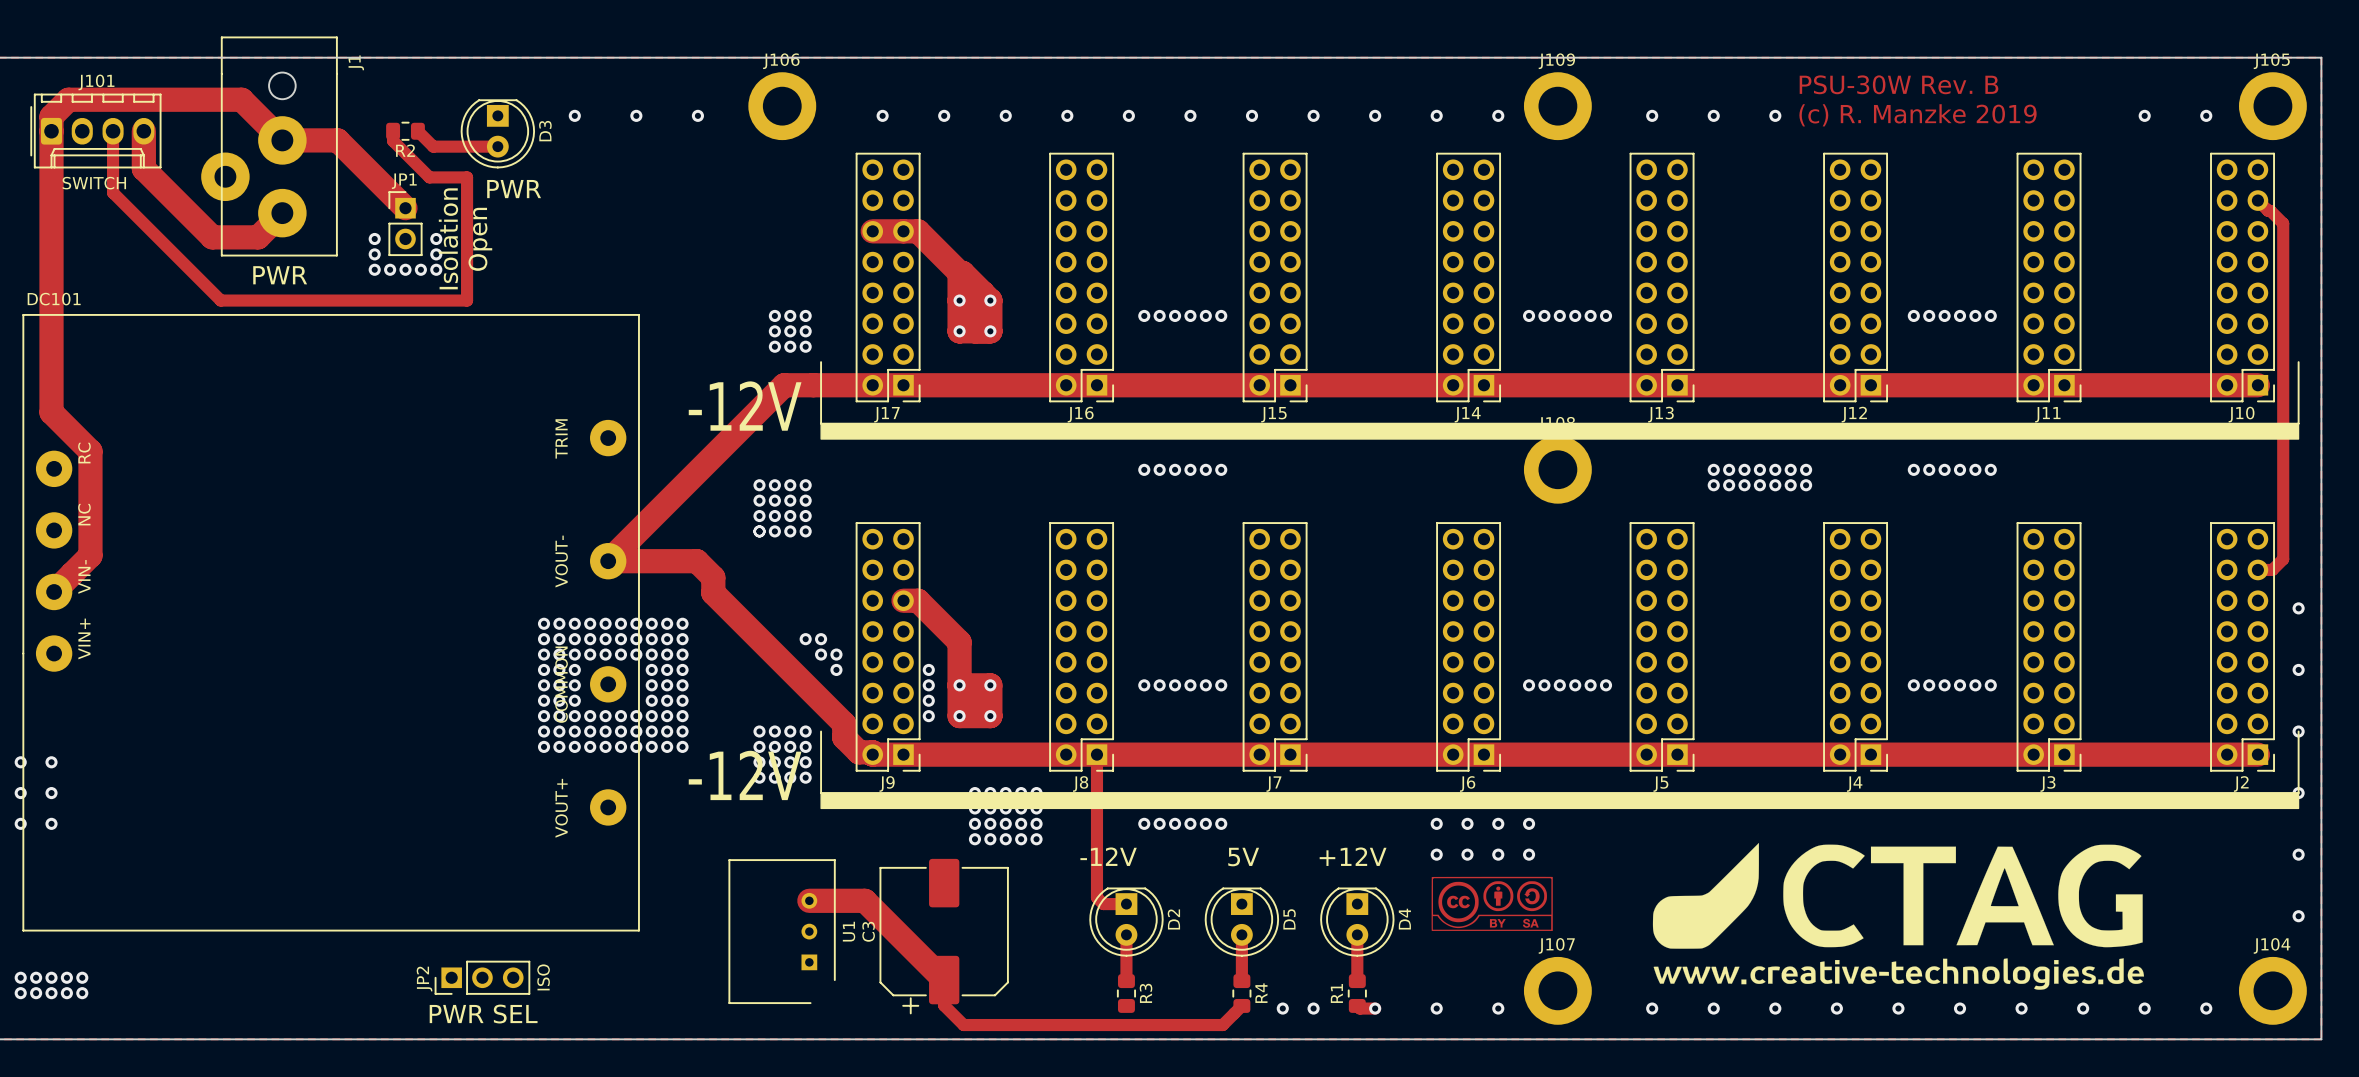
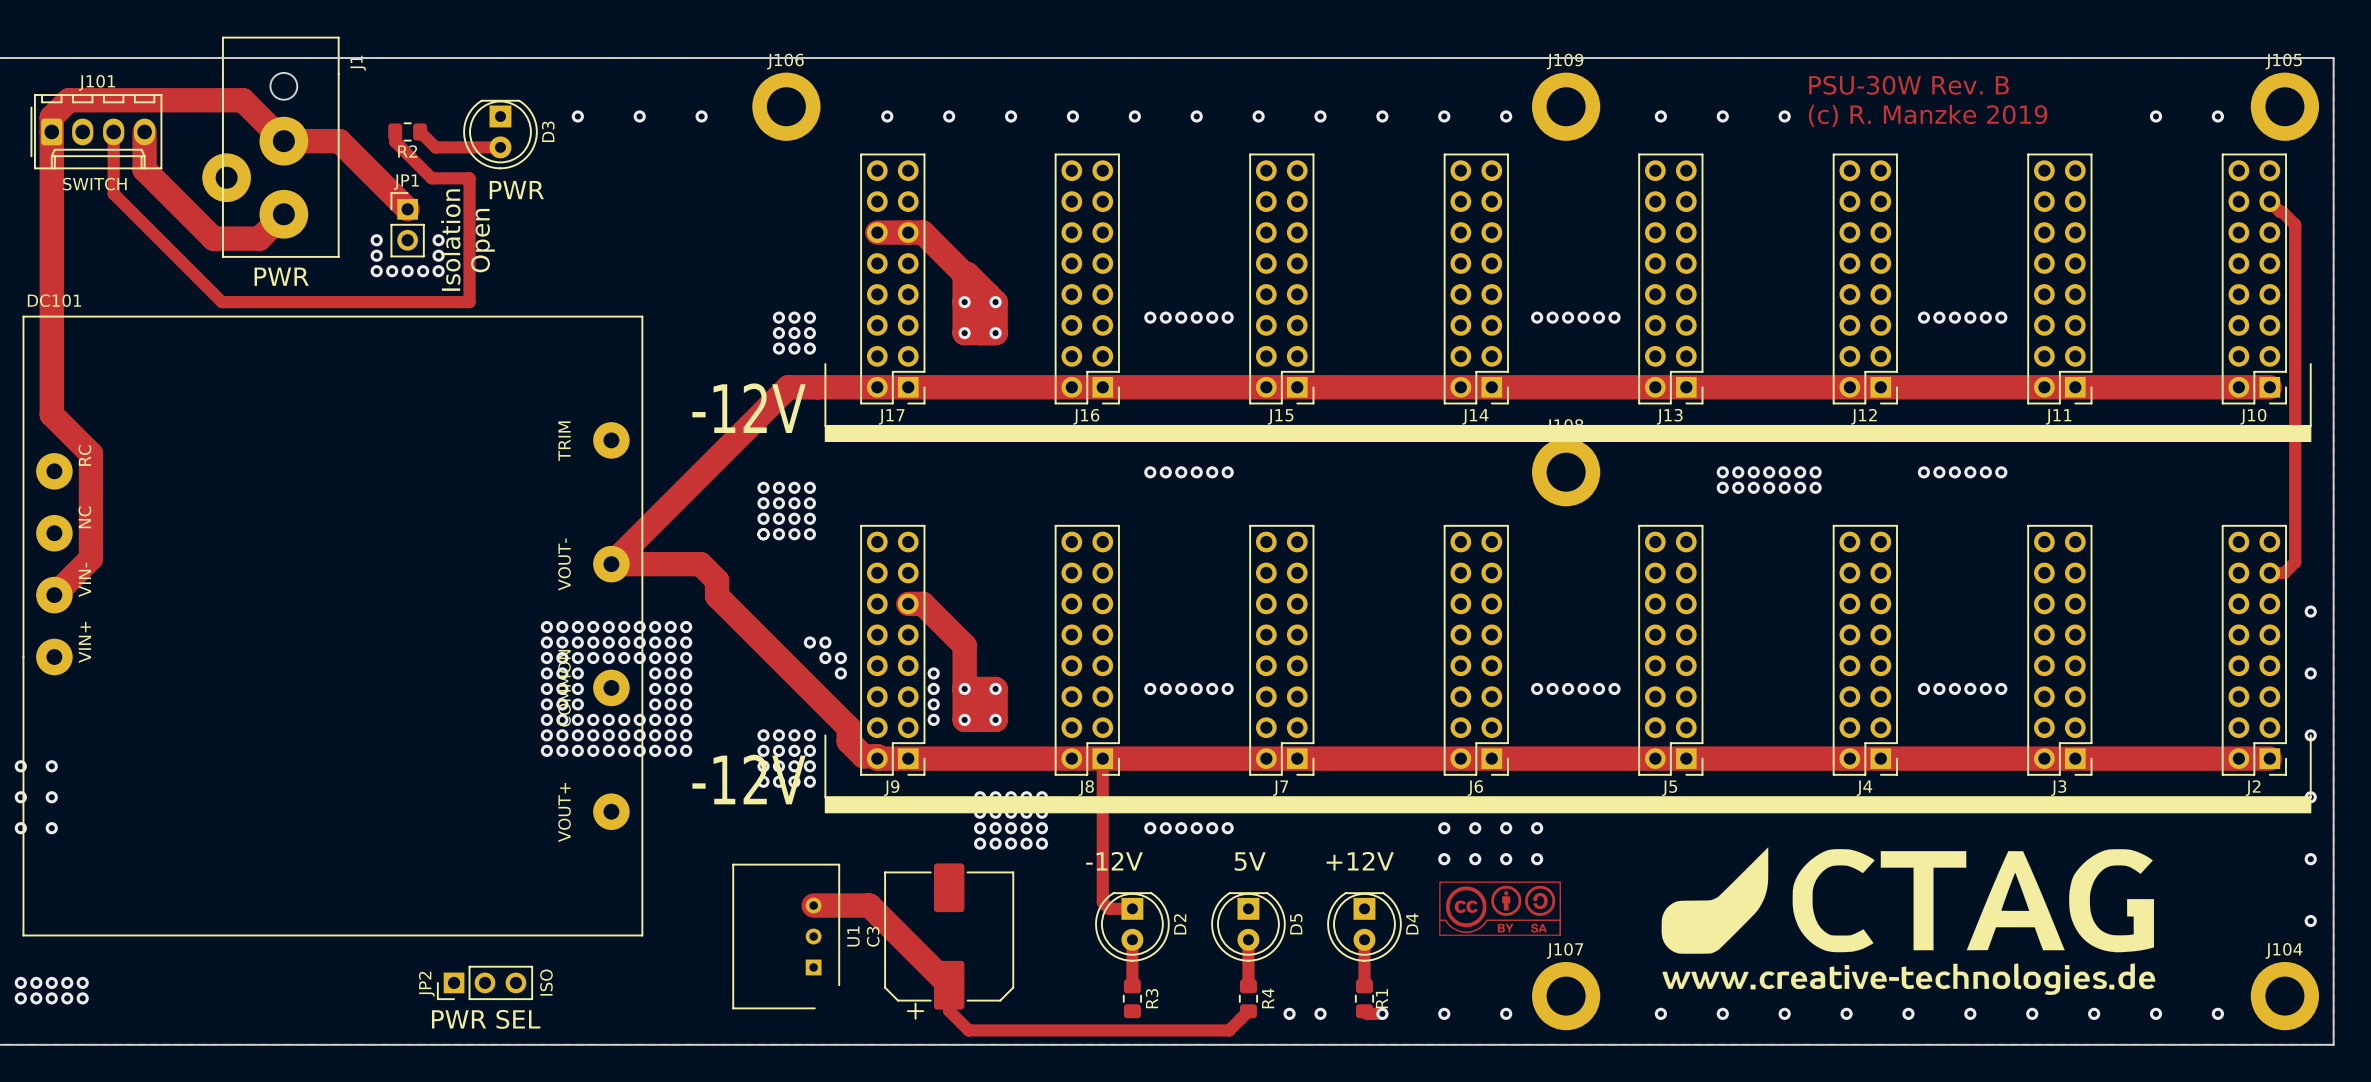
R1 name position: R1 (1336, 993) -> R1 (1381, 998)

